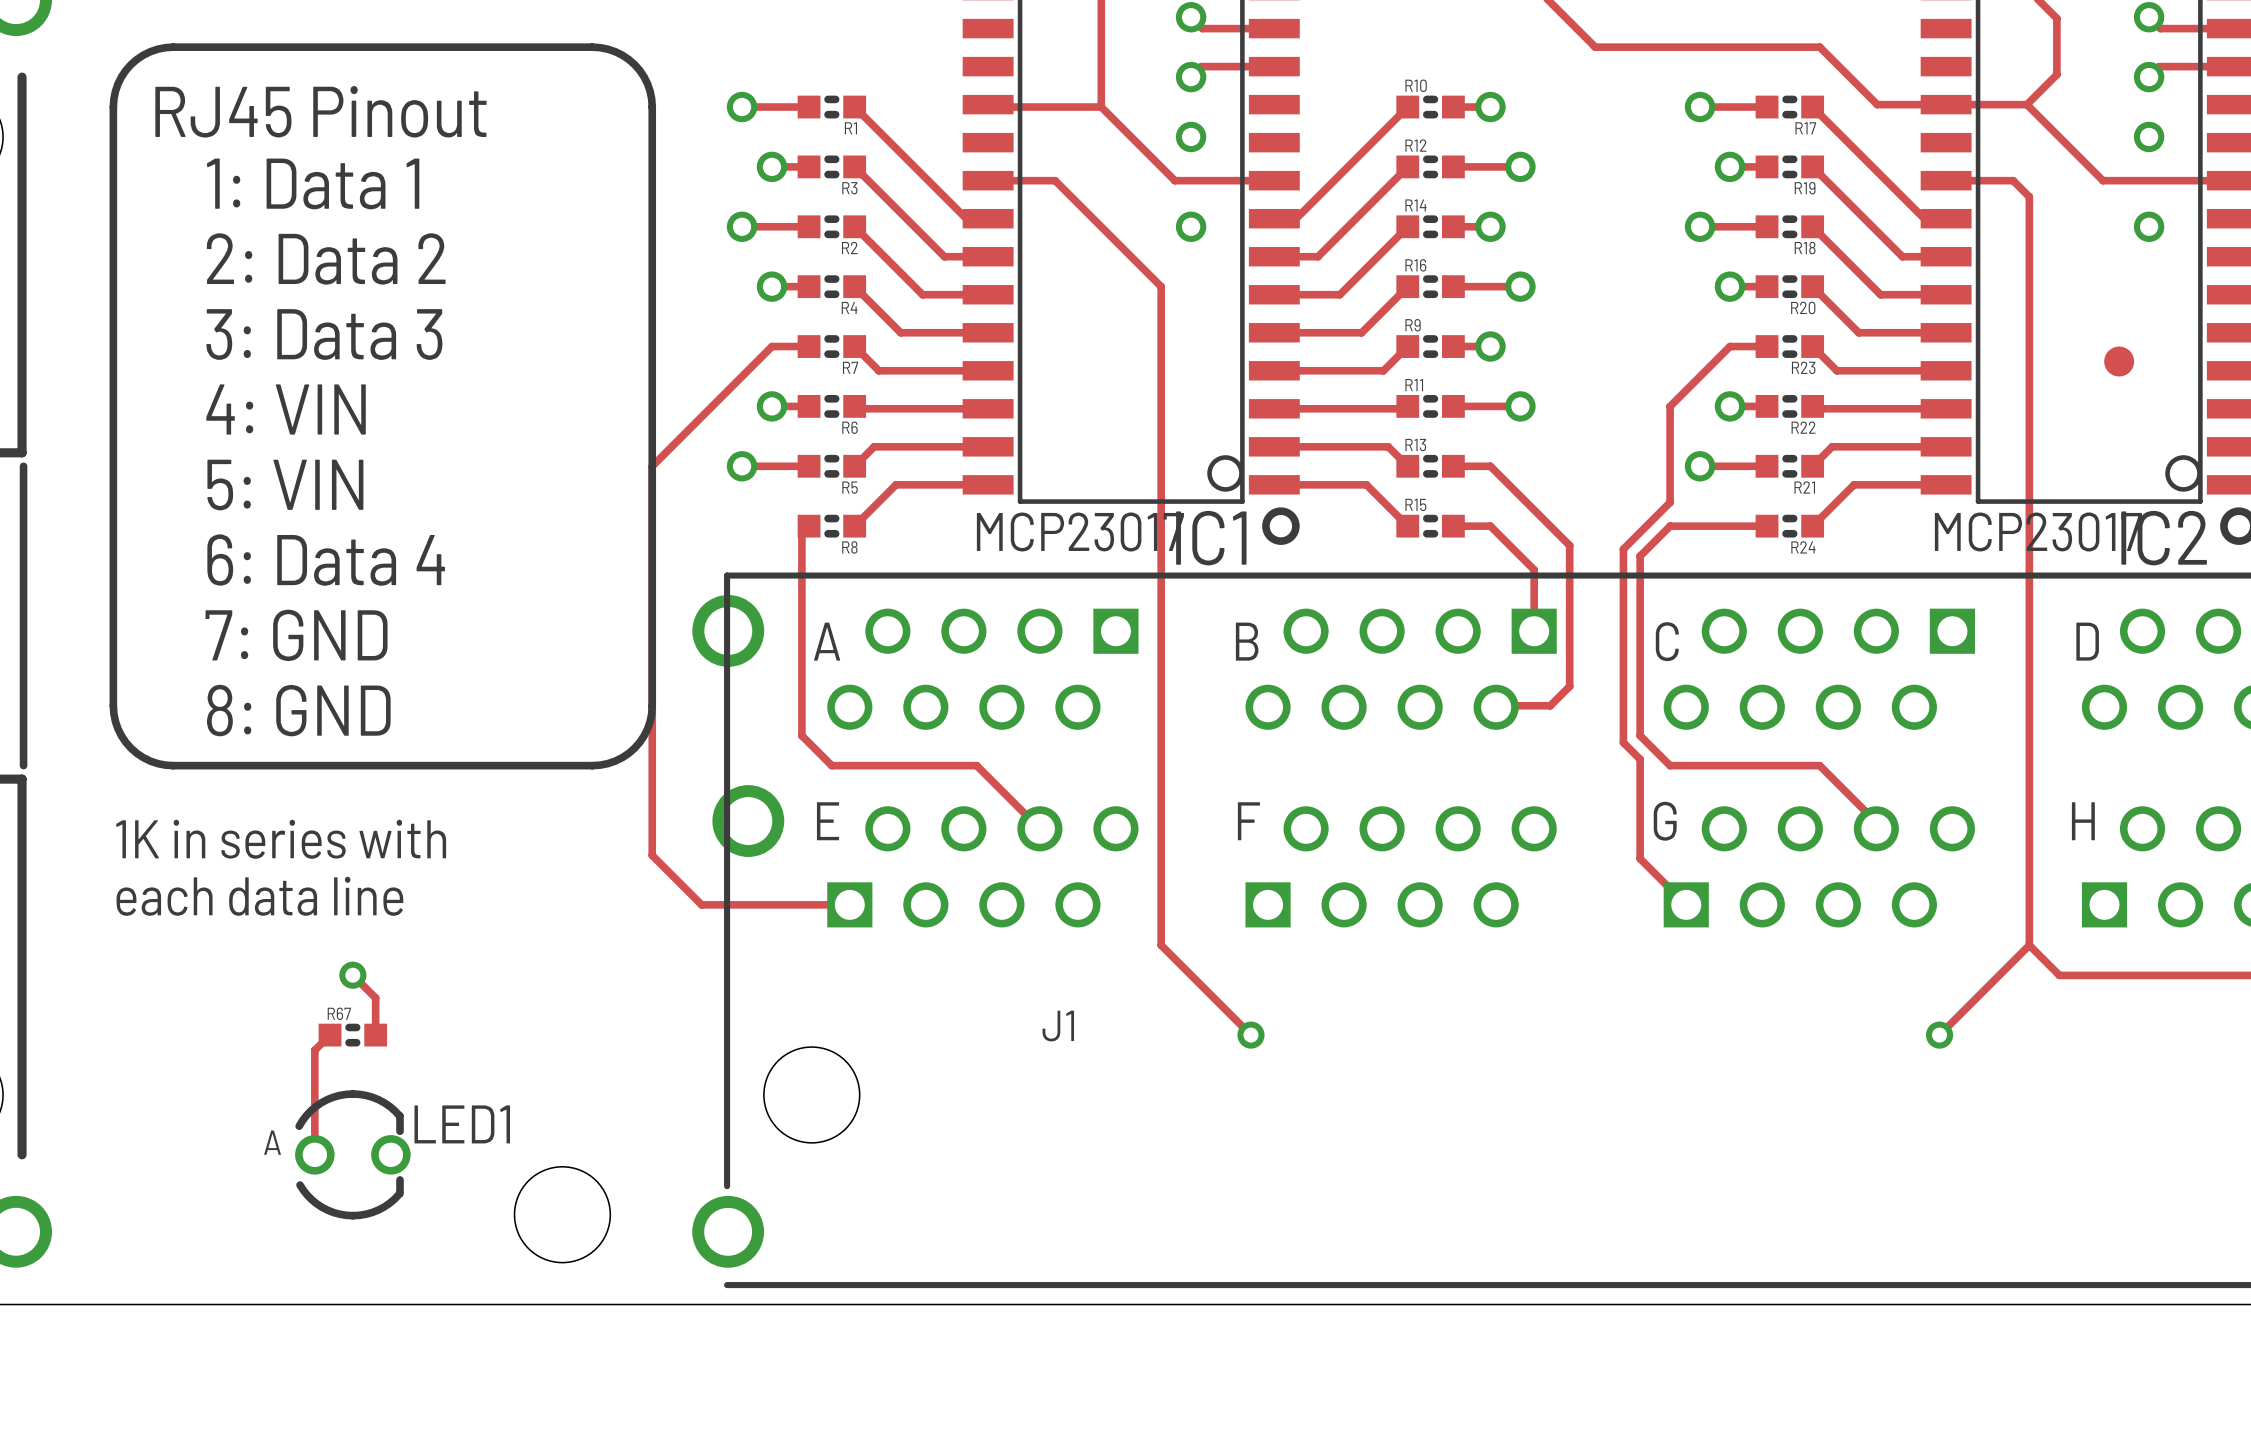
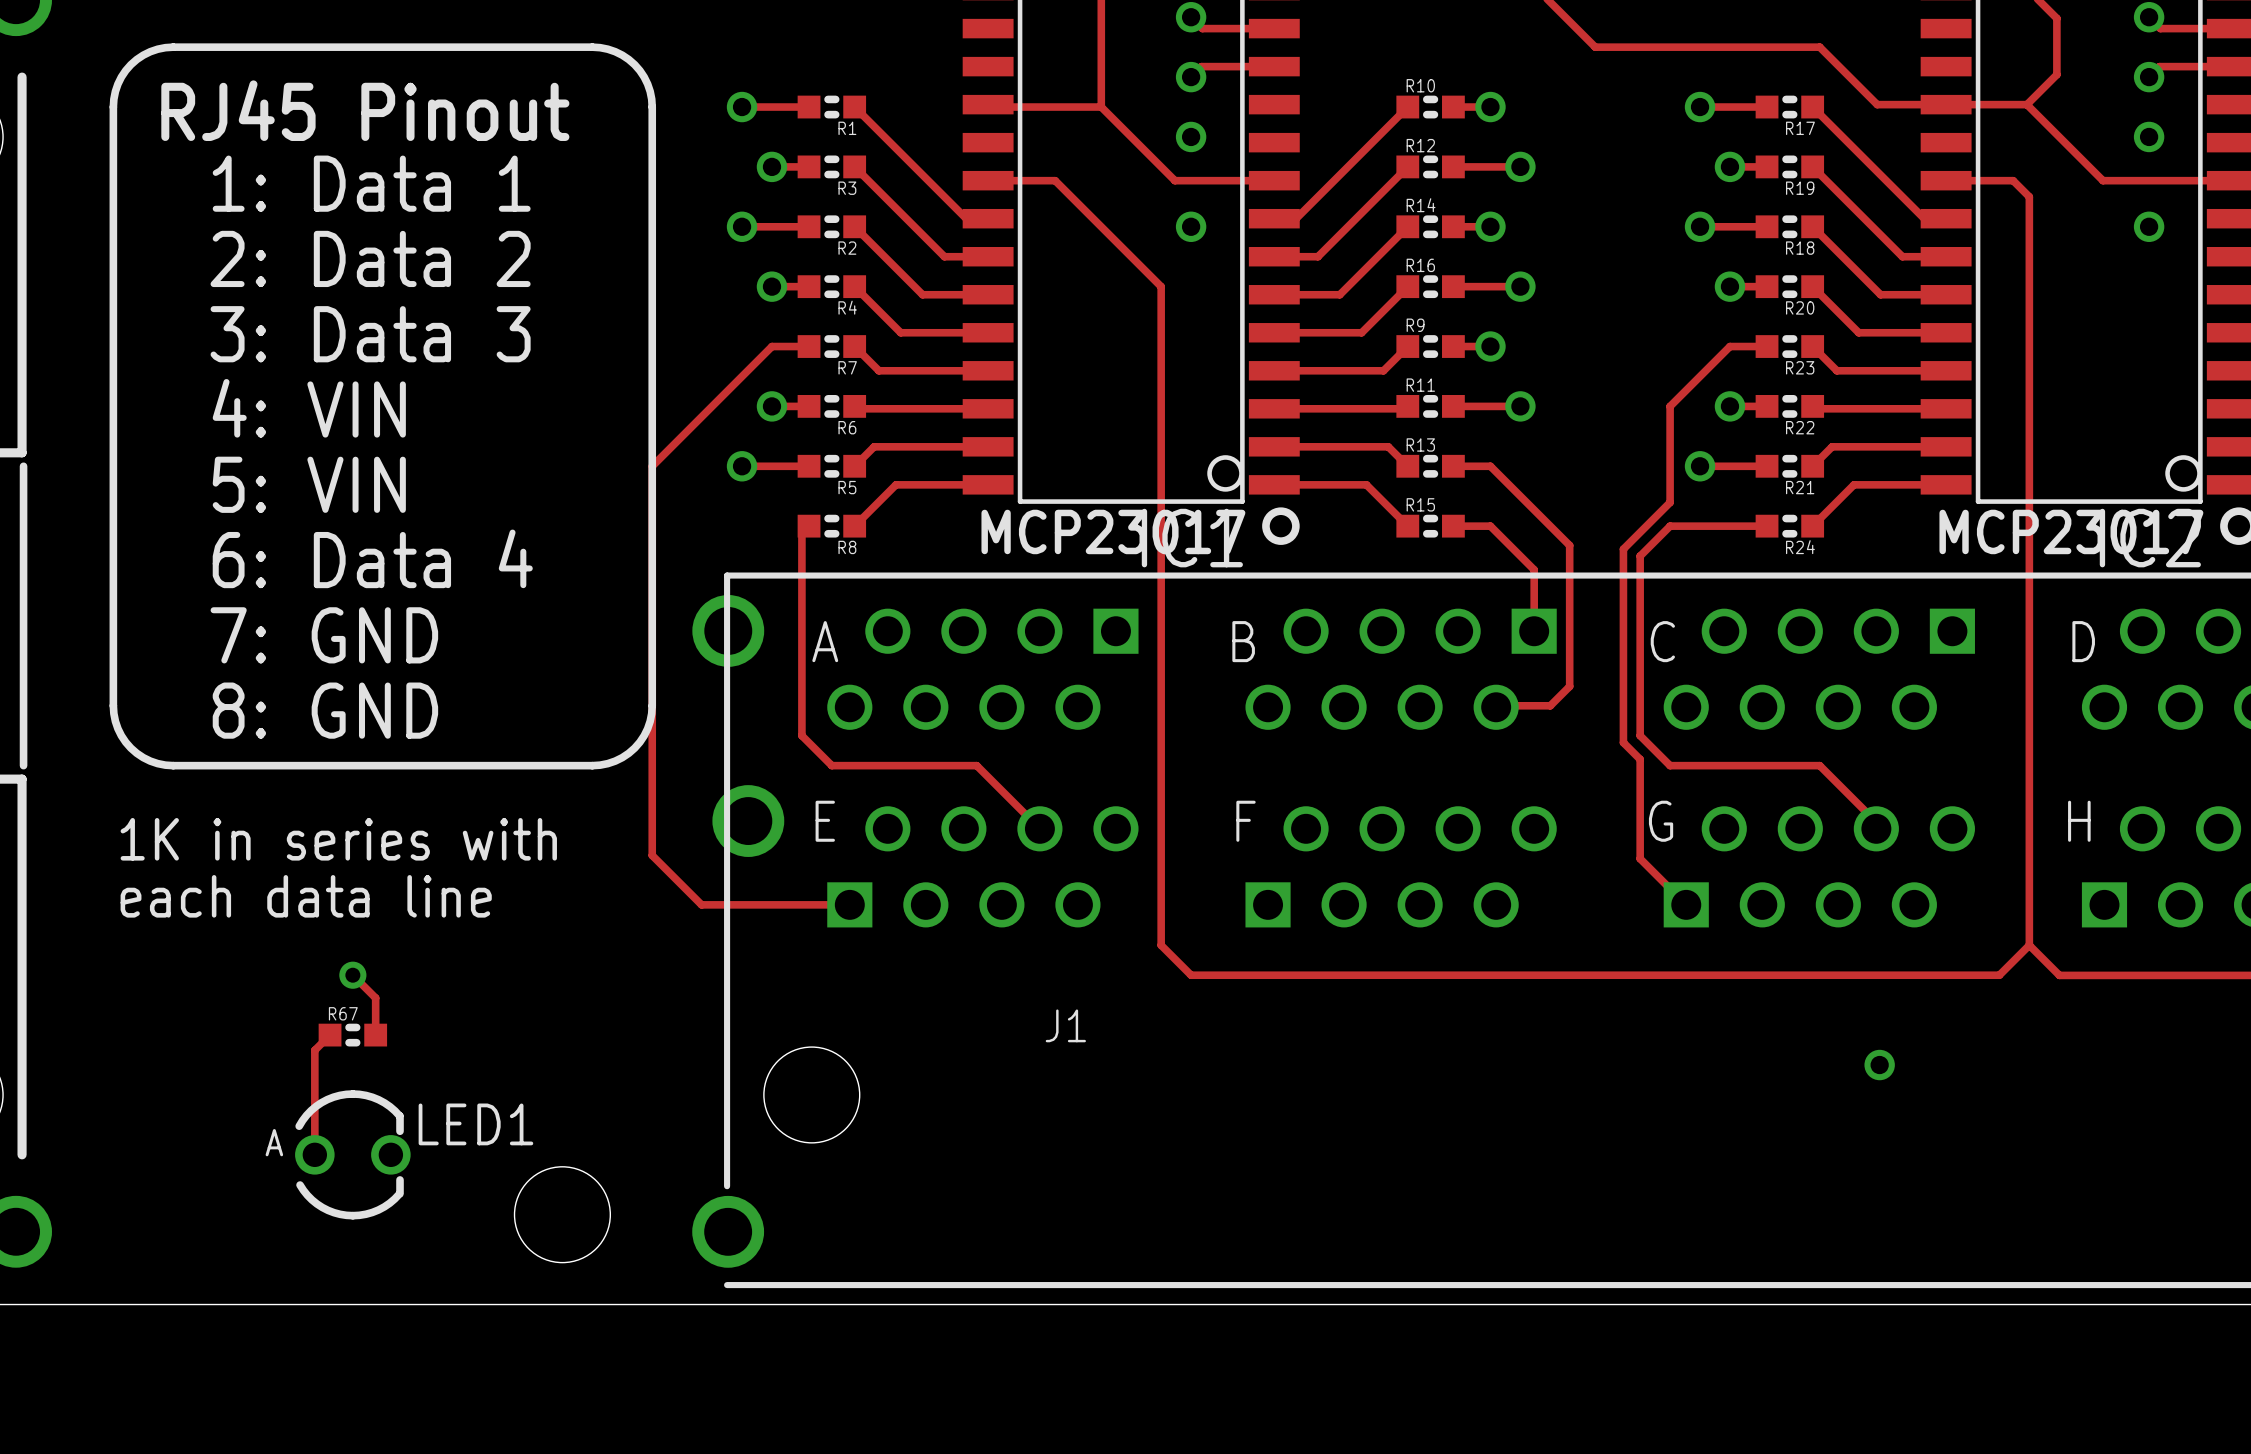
part: (2119, 361) -> none
track: (1191, 975) (1250, 1035) -> (1191, 975) (1999, 975)
track: (1999, 975) (1939, 1035) -> none
via: (1250, 1035) -> none
via: (1939, 1035) -> none
via: none -> (1879, 1065)

